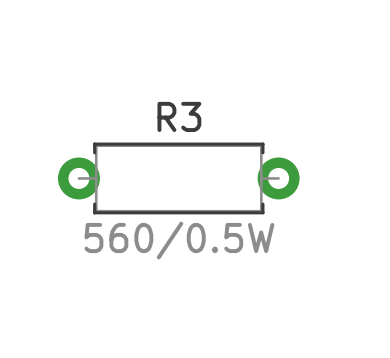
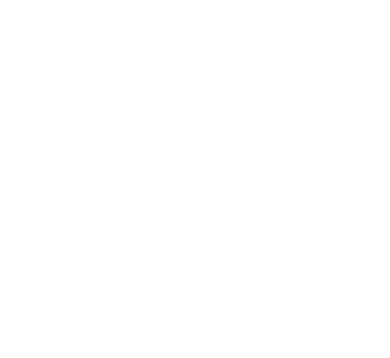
R3: 560/0.5W (178, 178) -> none

